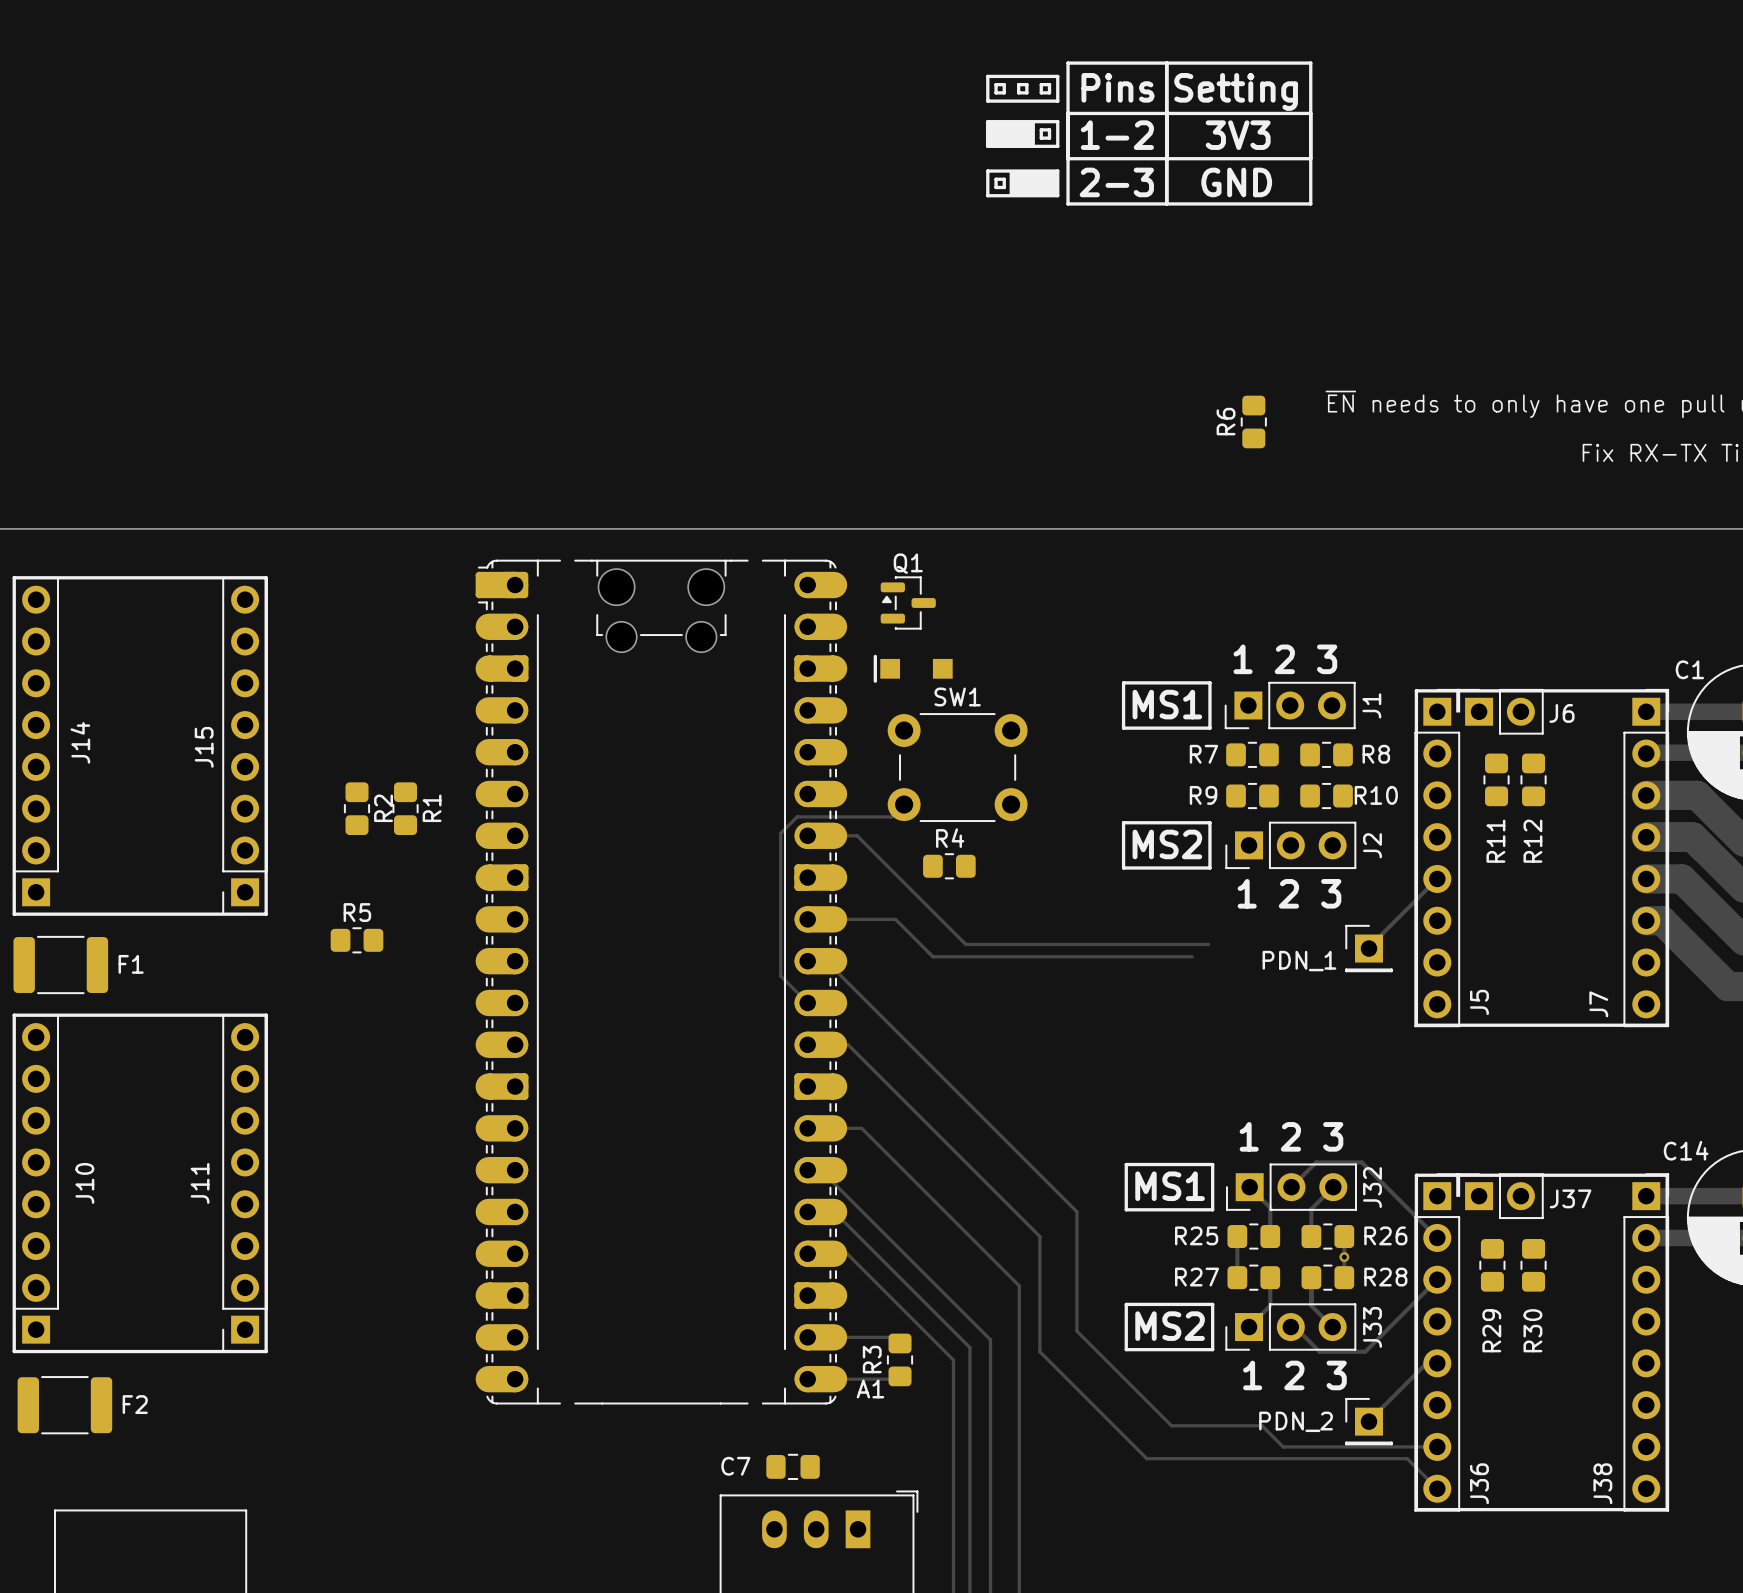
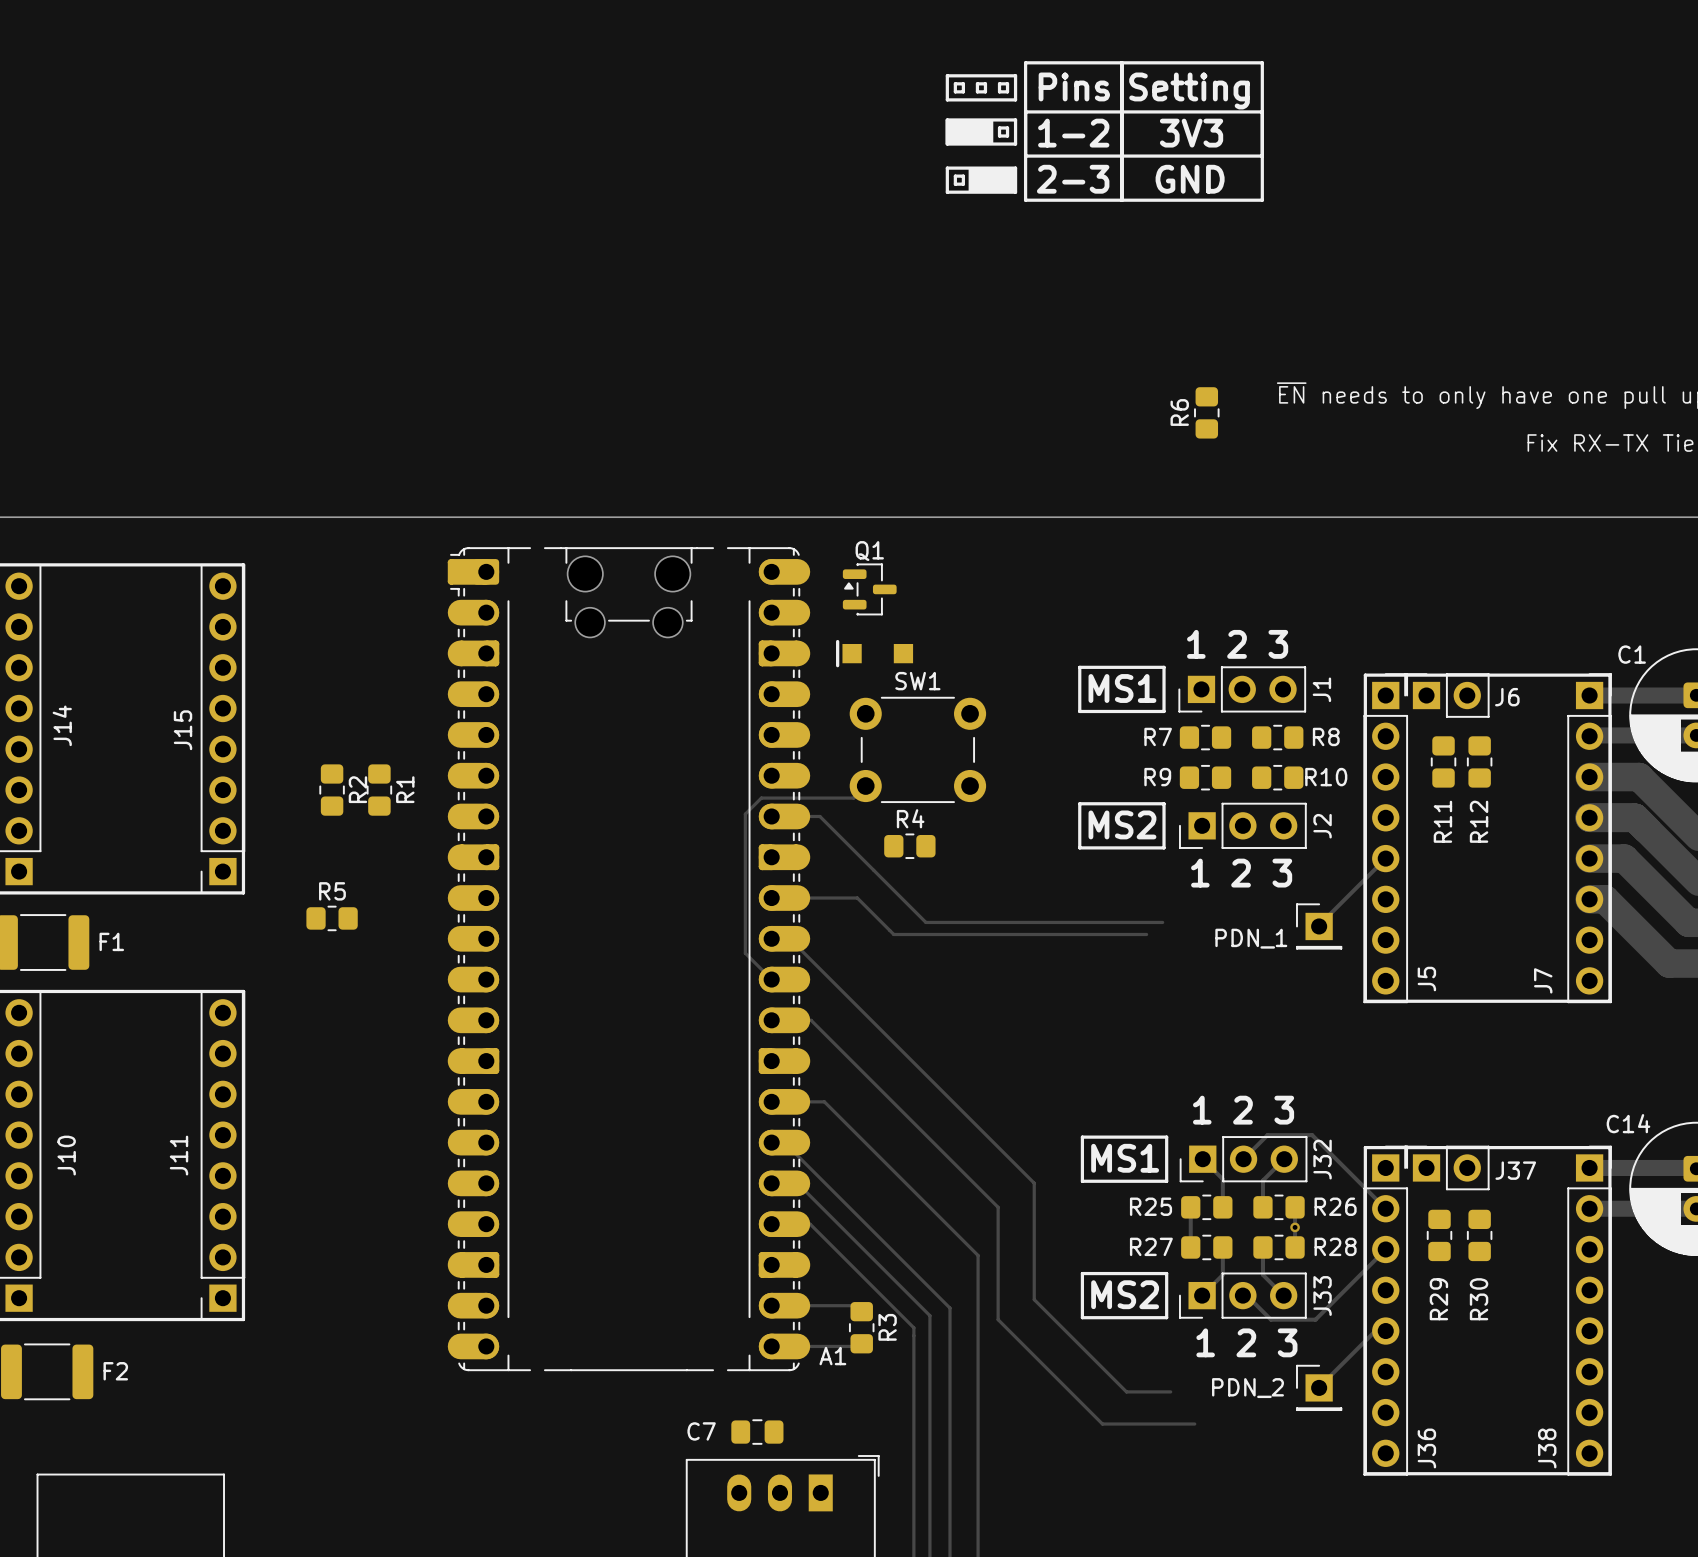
R3 name position: R3 (872, 1359) -> R3 (887, 1327)
track: (1216, 1425) (1262, 1425) (1283, 1446) (1437, 1446) -> none
track: (1241, 1458) (1407, 1458) (1437, 1488) -> none

